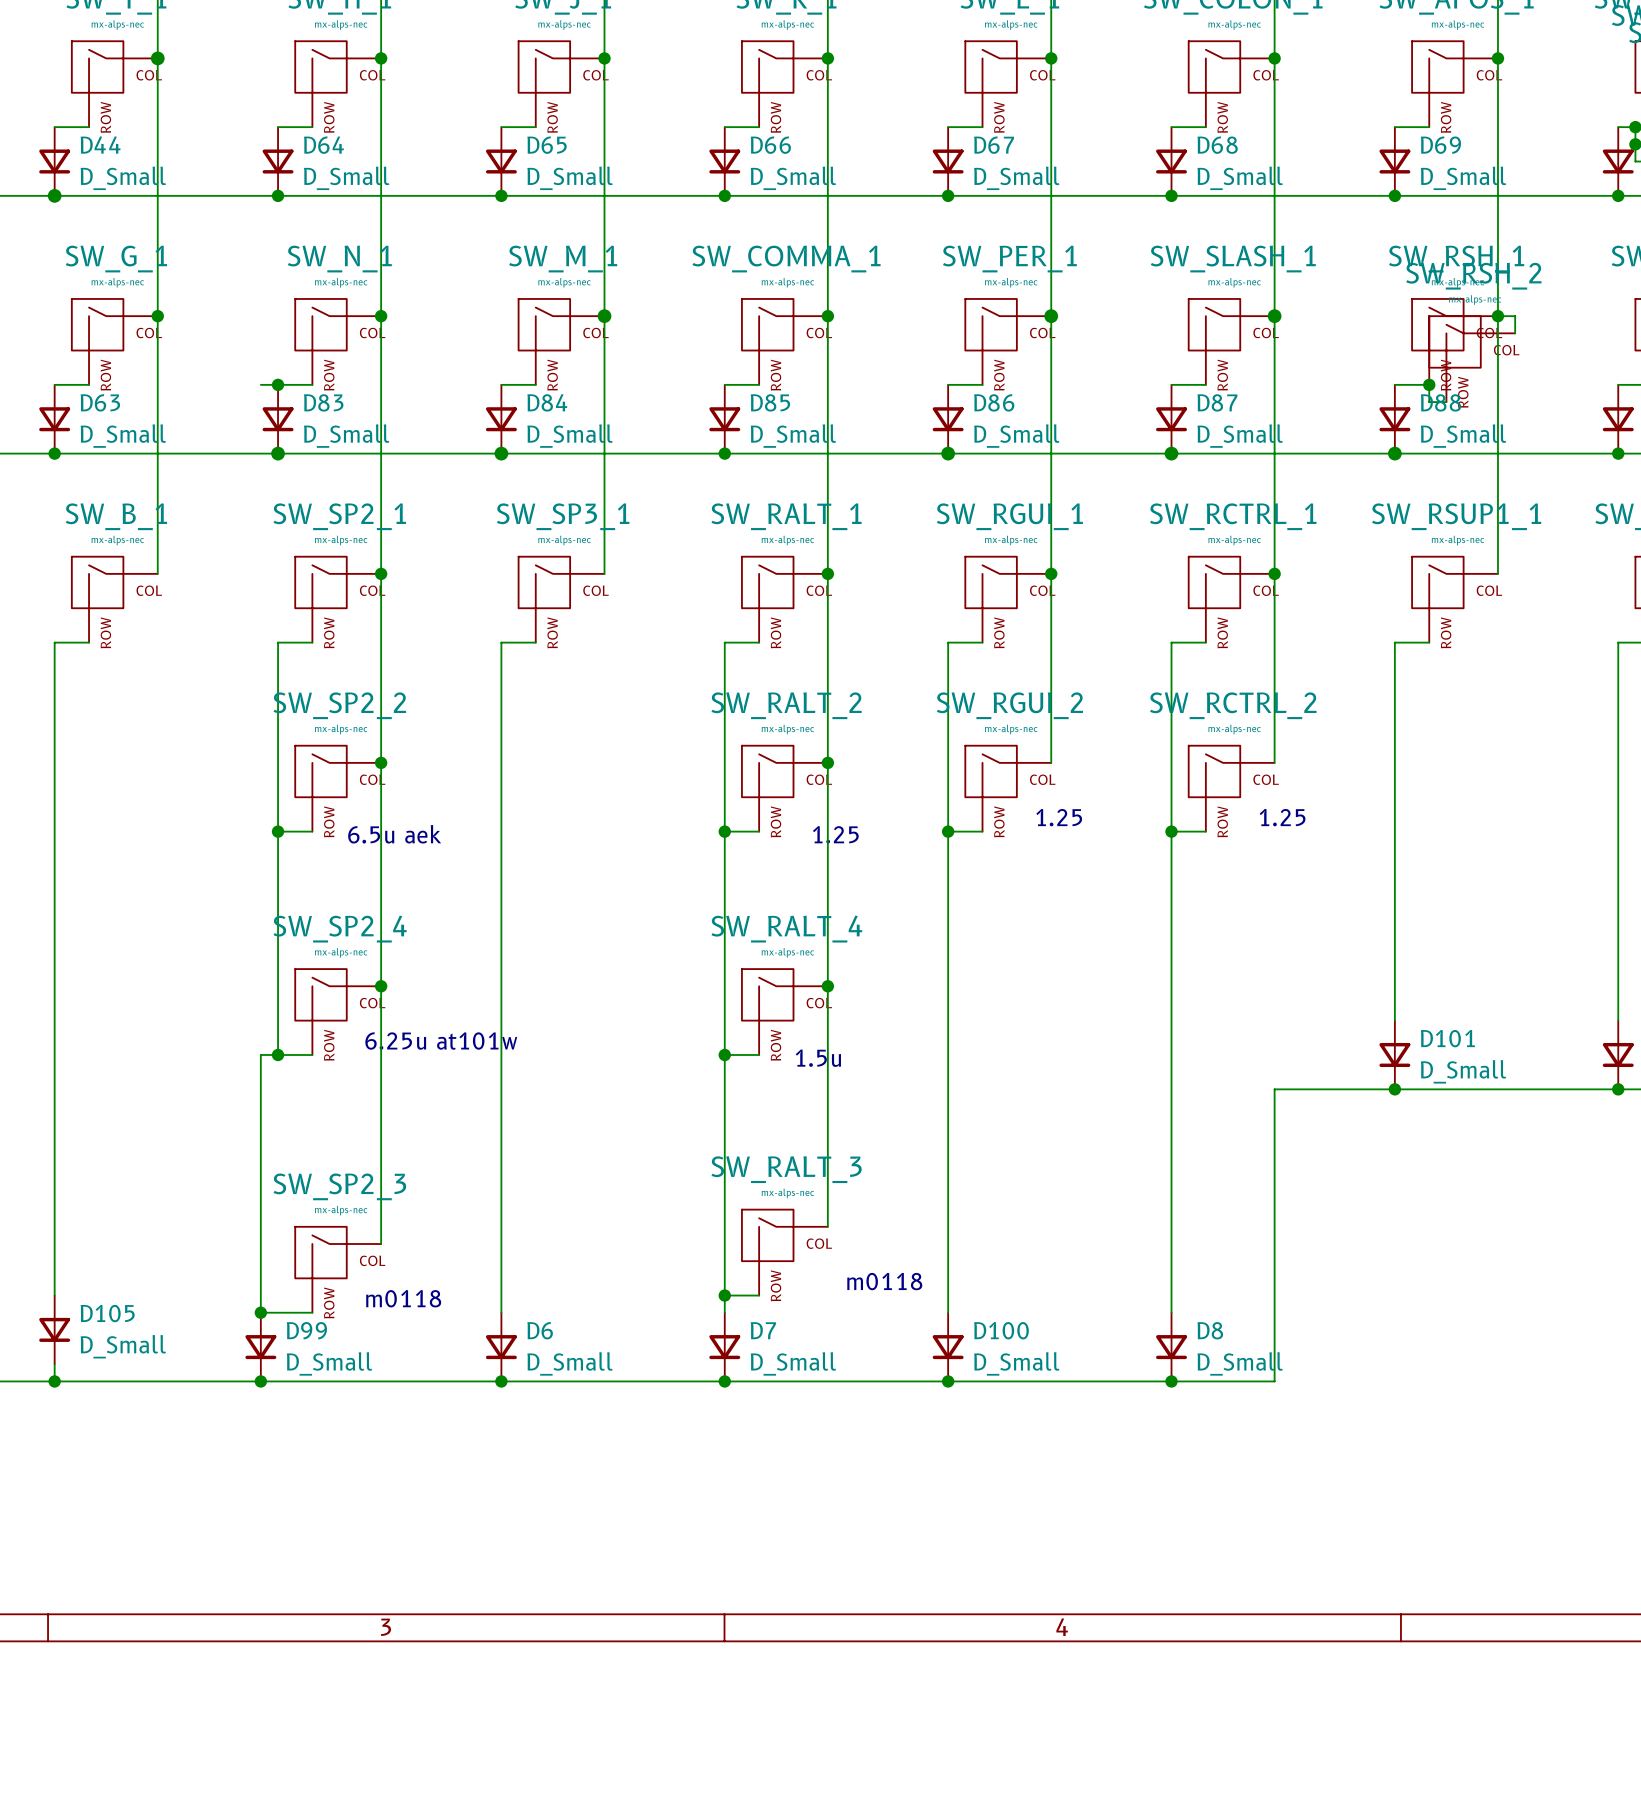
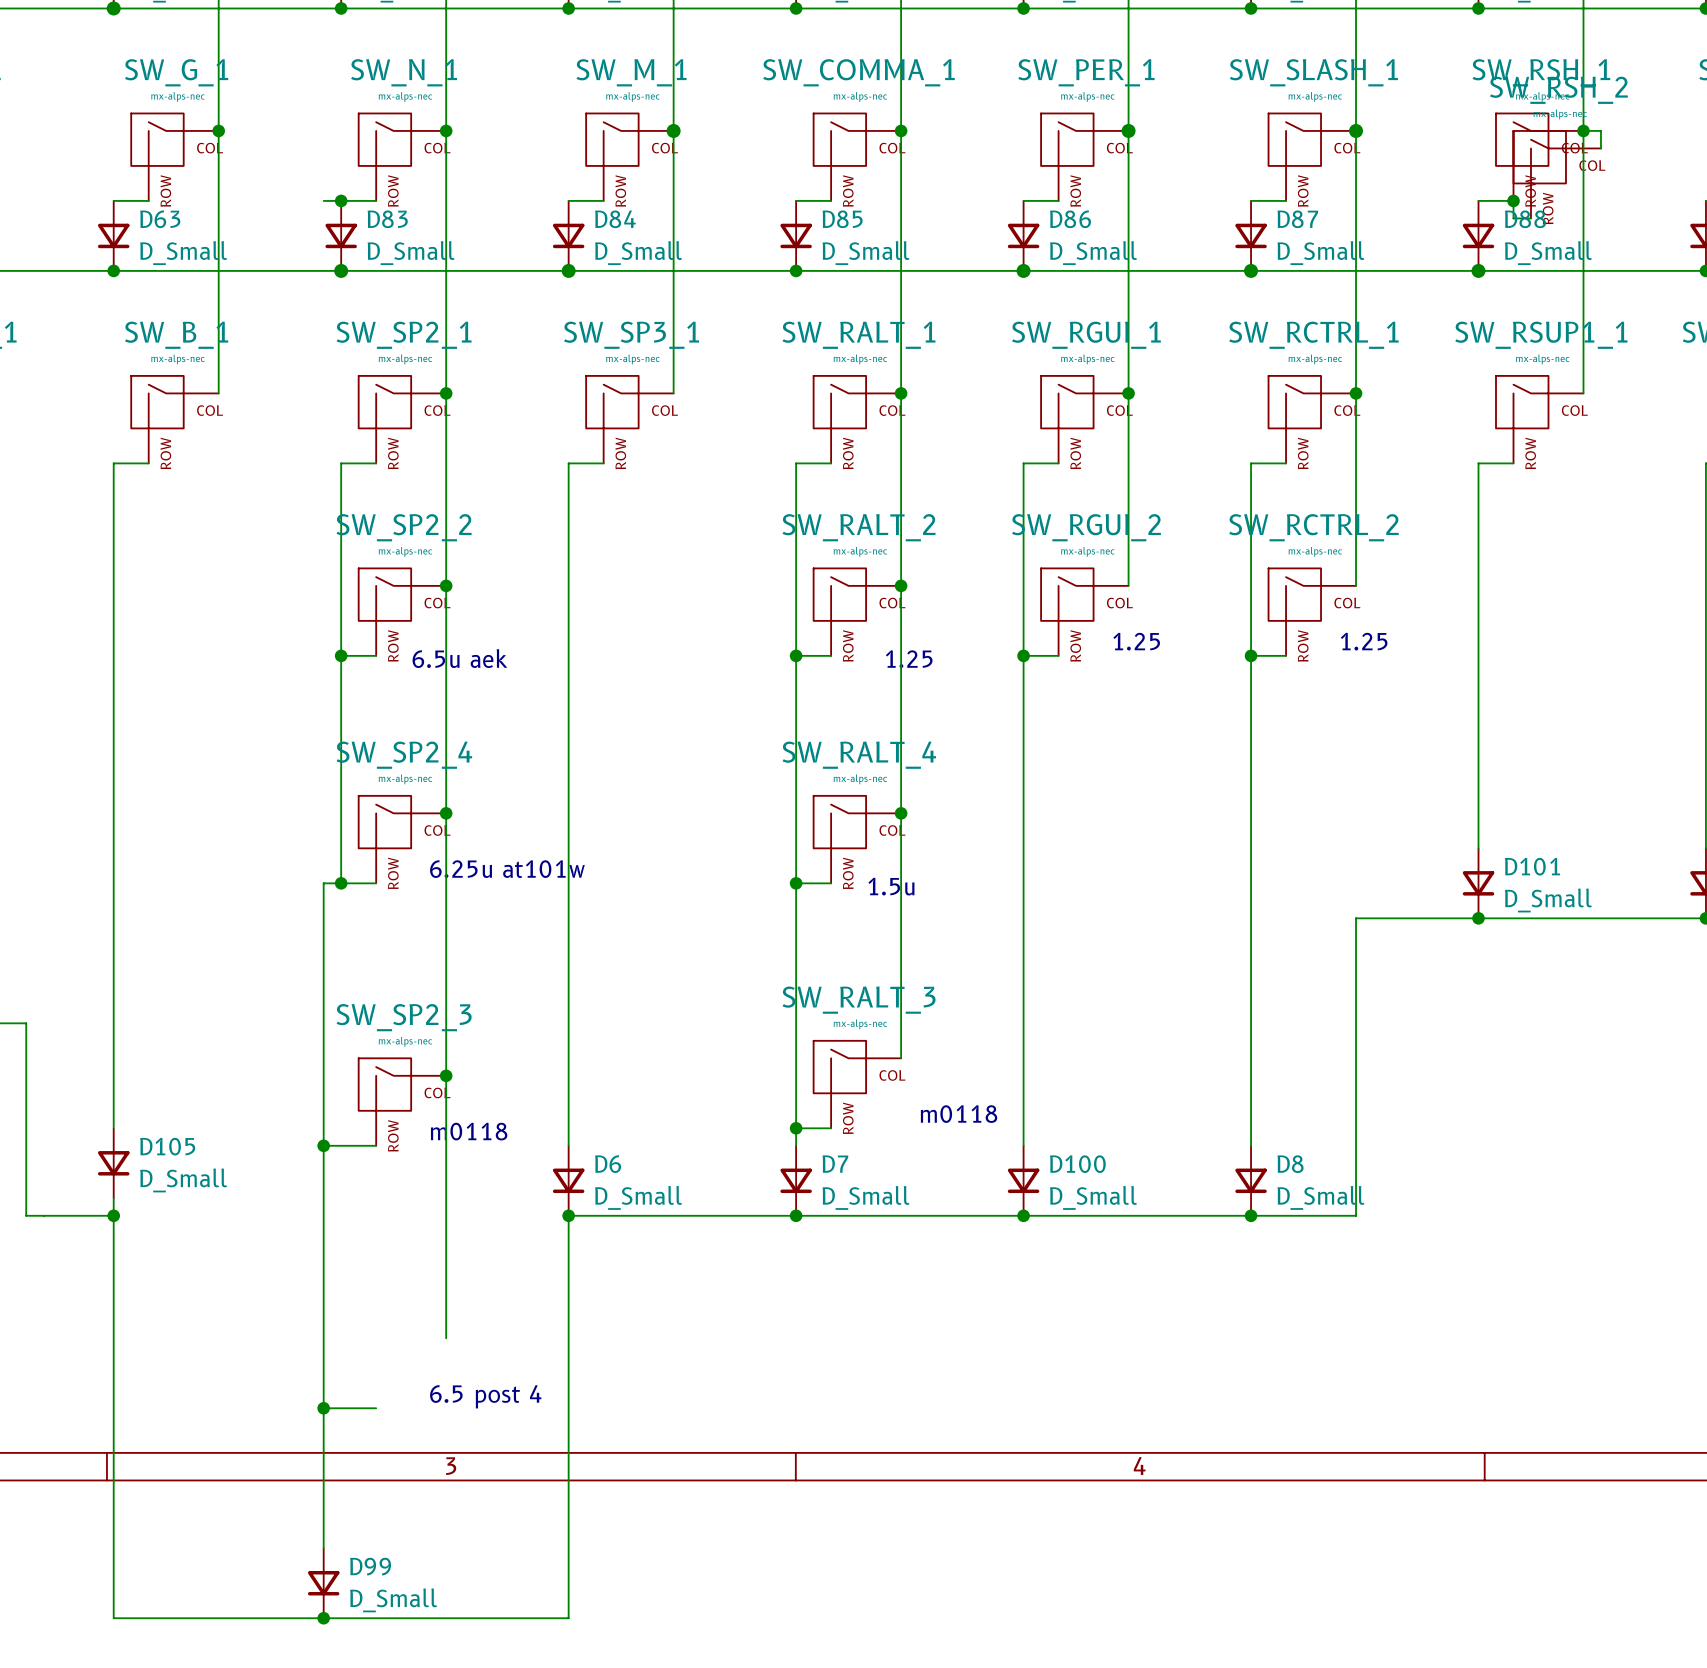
wire: none -> (446, 1075) (446, 1338)
junction: none -> (446, 1075)
wire: none -> (323, 1145) (323, 1548)
D99 position: (260, 1347) -> (323, 1583)
wire: (54, 1381) (501, 1381) -> (113, 1215) (113, 1618) (568, 1618) (568, 1215)
junction: (260, 1381) -> none
text: none -> 6.5 post 4 (485, 1396)
wire: none -> (323, 1408) (376, 1408)
junction: none -> (323, 1408)
junction: none -> (323, 1618)

